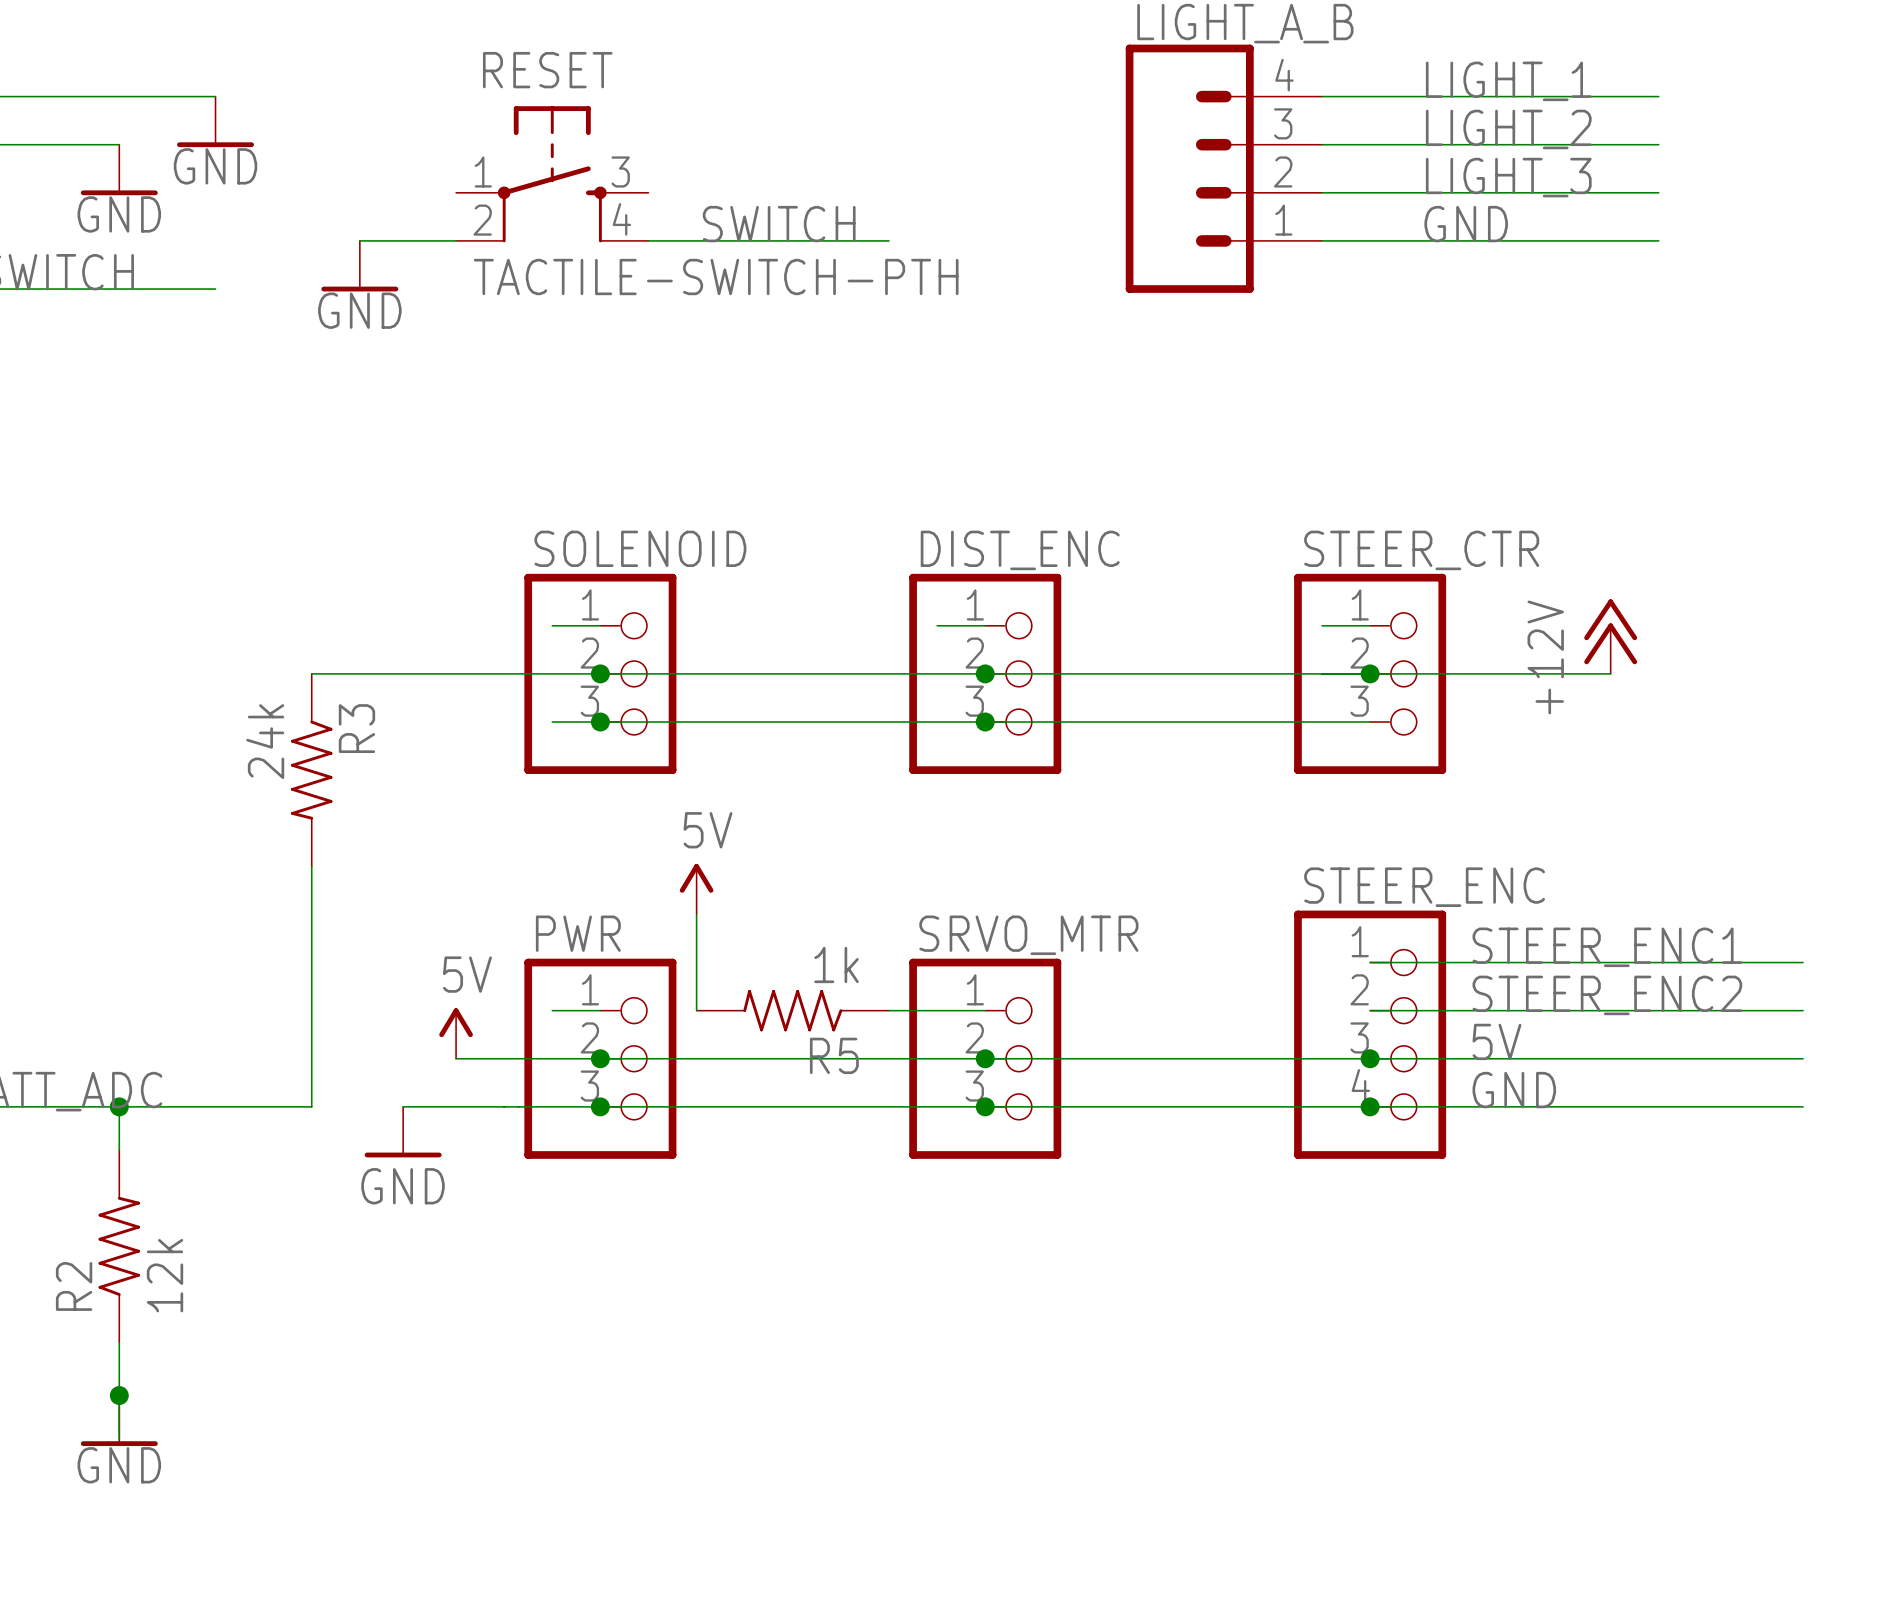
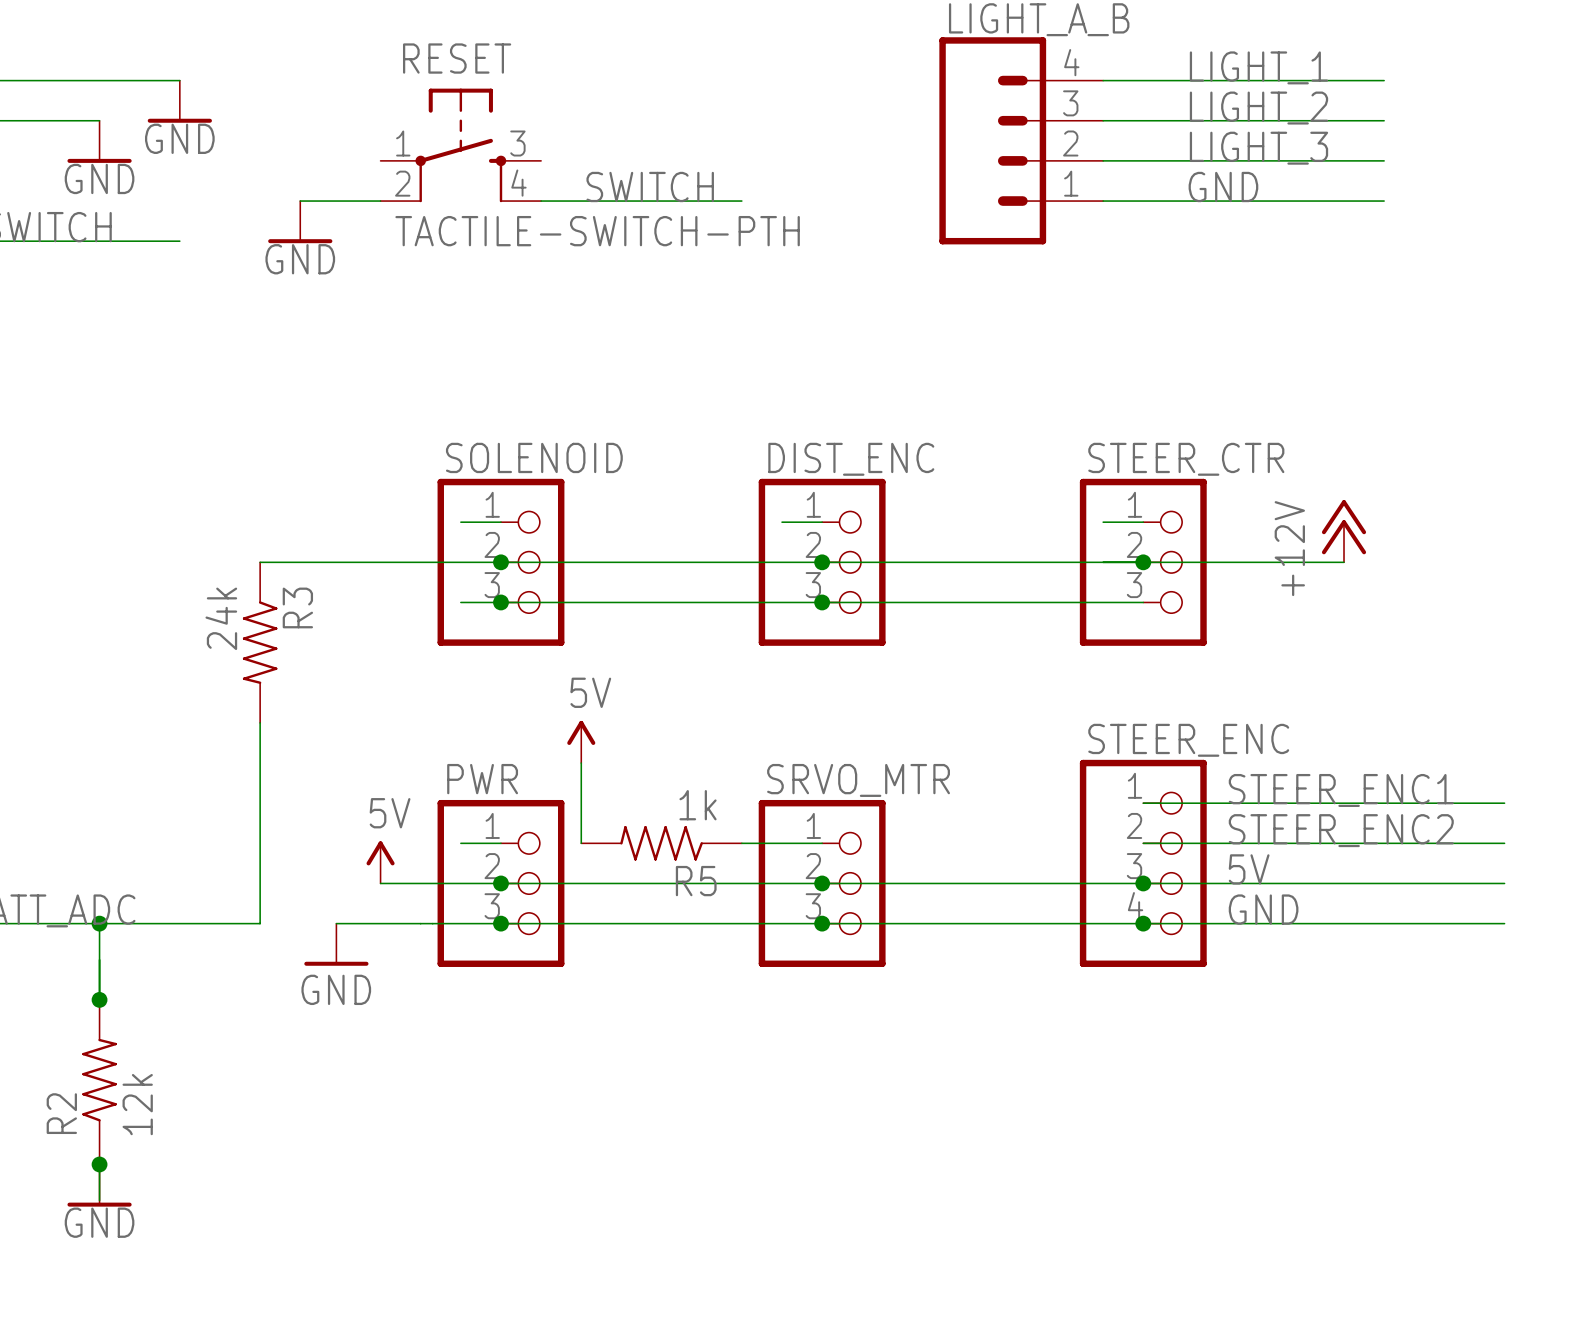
junction: none -> (99, 999)
R2 position: (119, 1246) -> (99, 1080)

